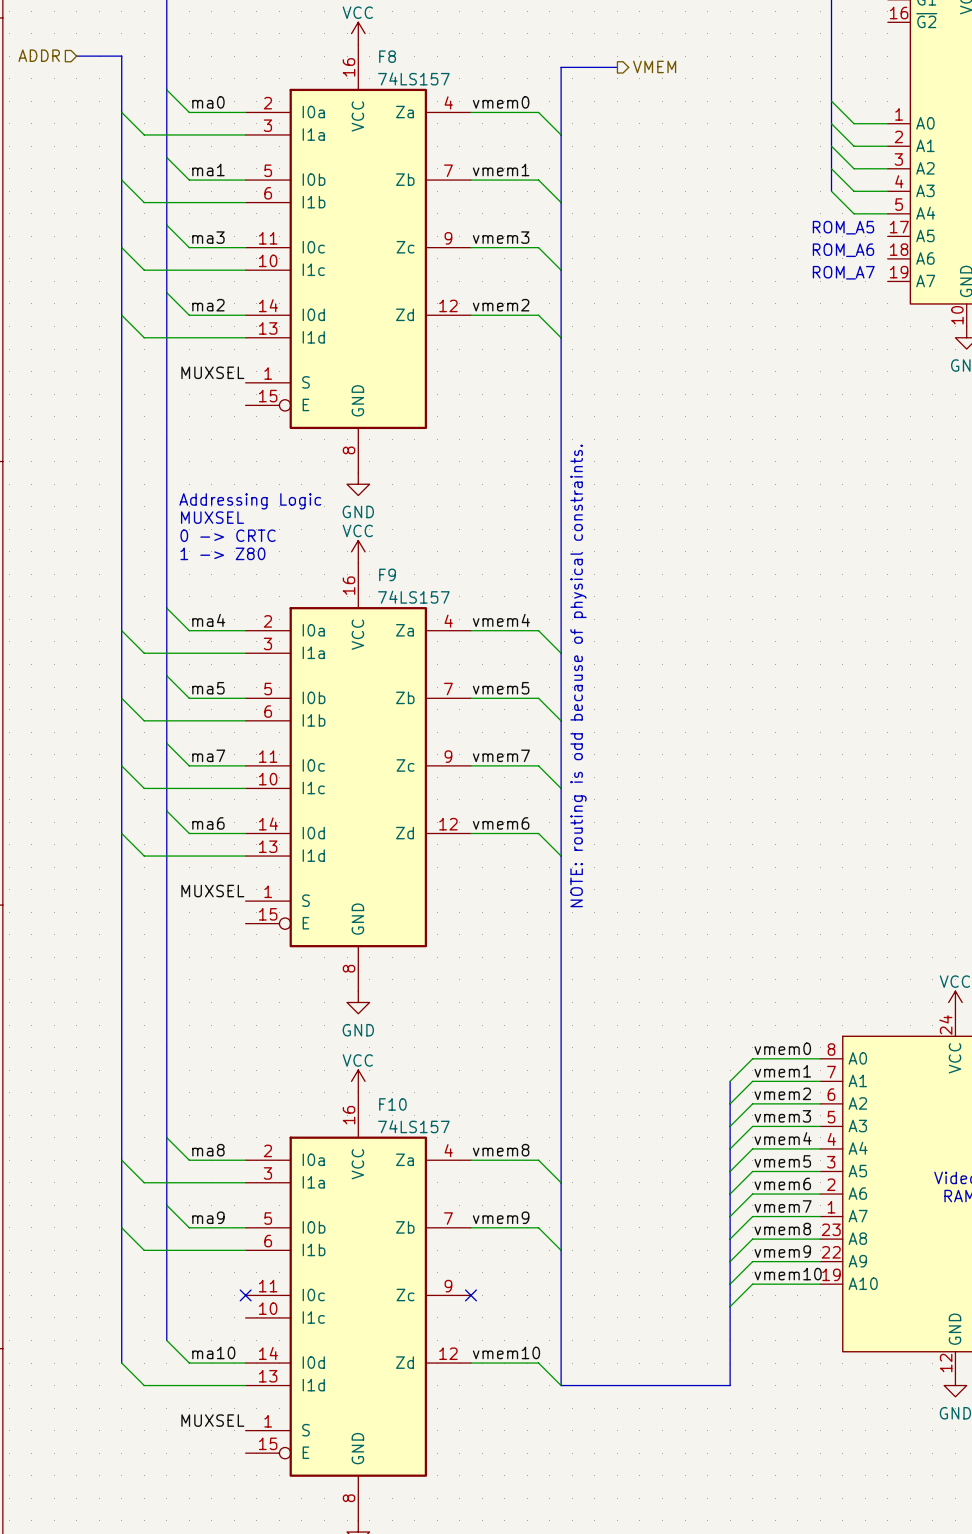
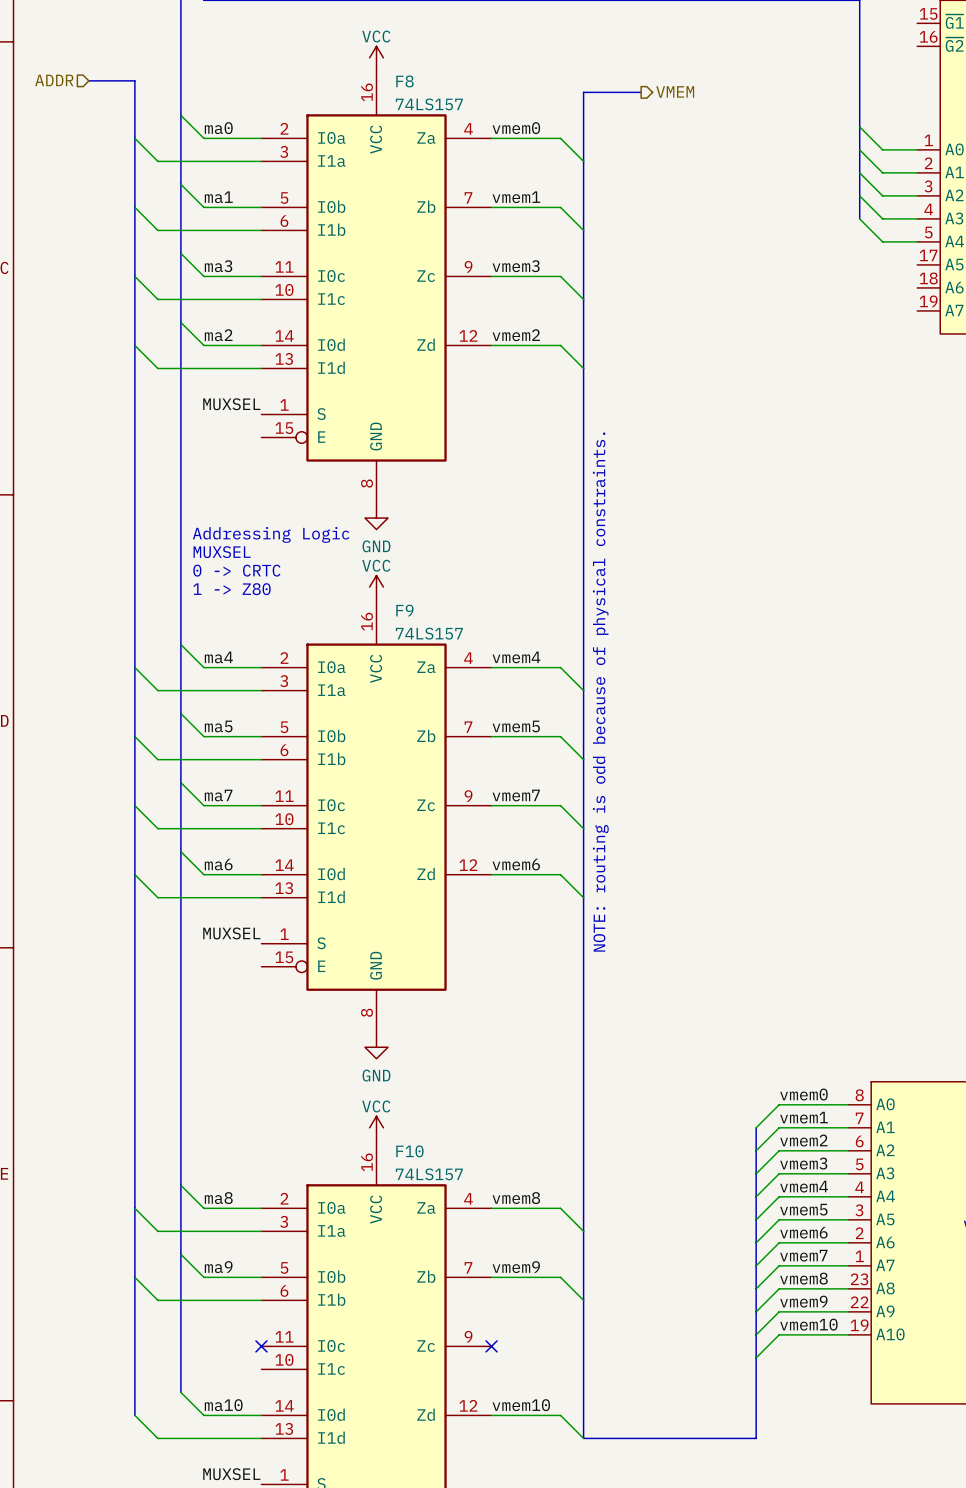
text: ROM_A5 (843, 227) -> none
text: ROM_A6 (843, 250) -> none
text: ROM_A7 (843, 272) -> none

